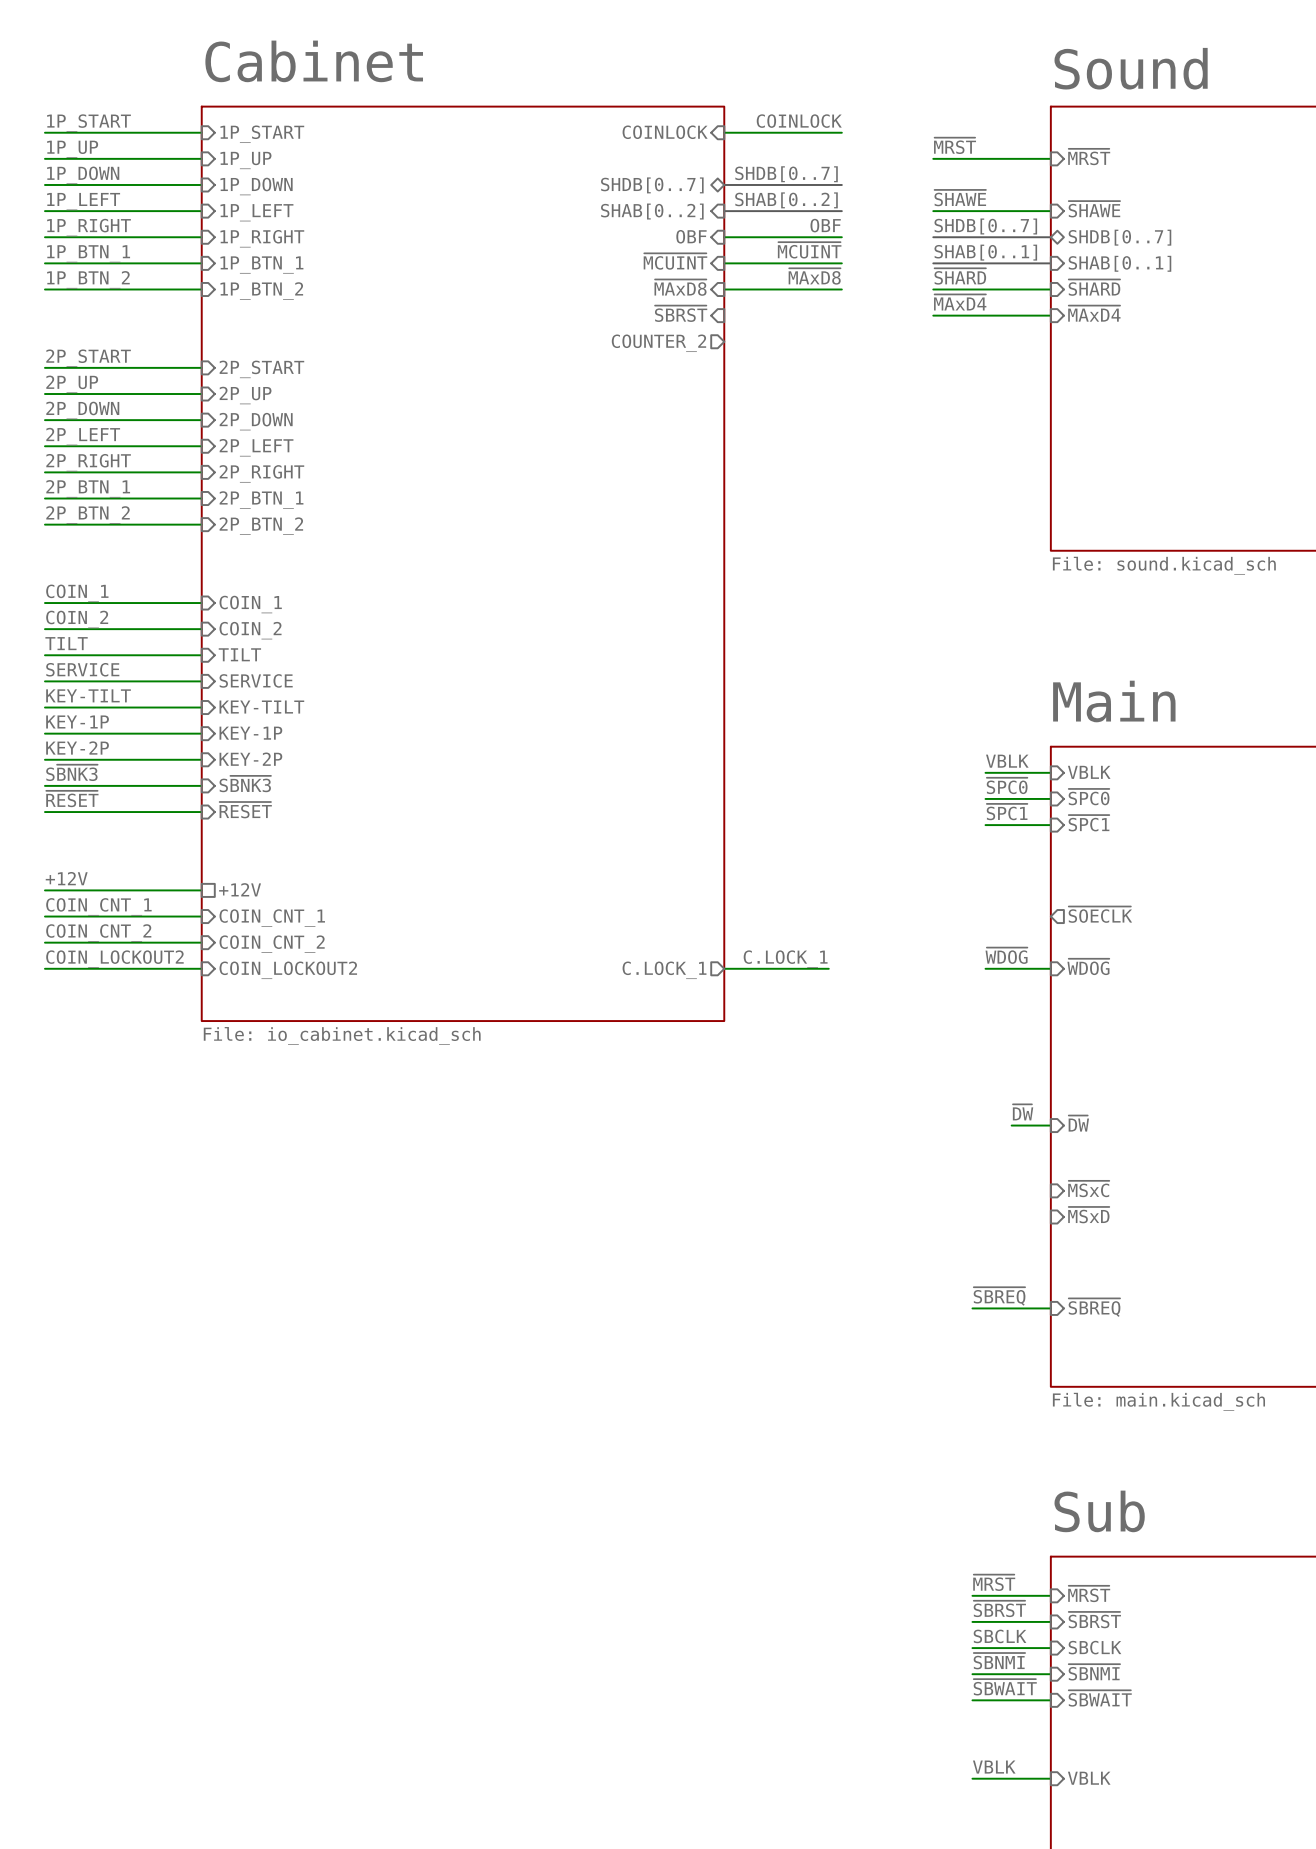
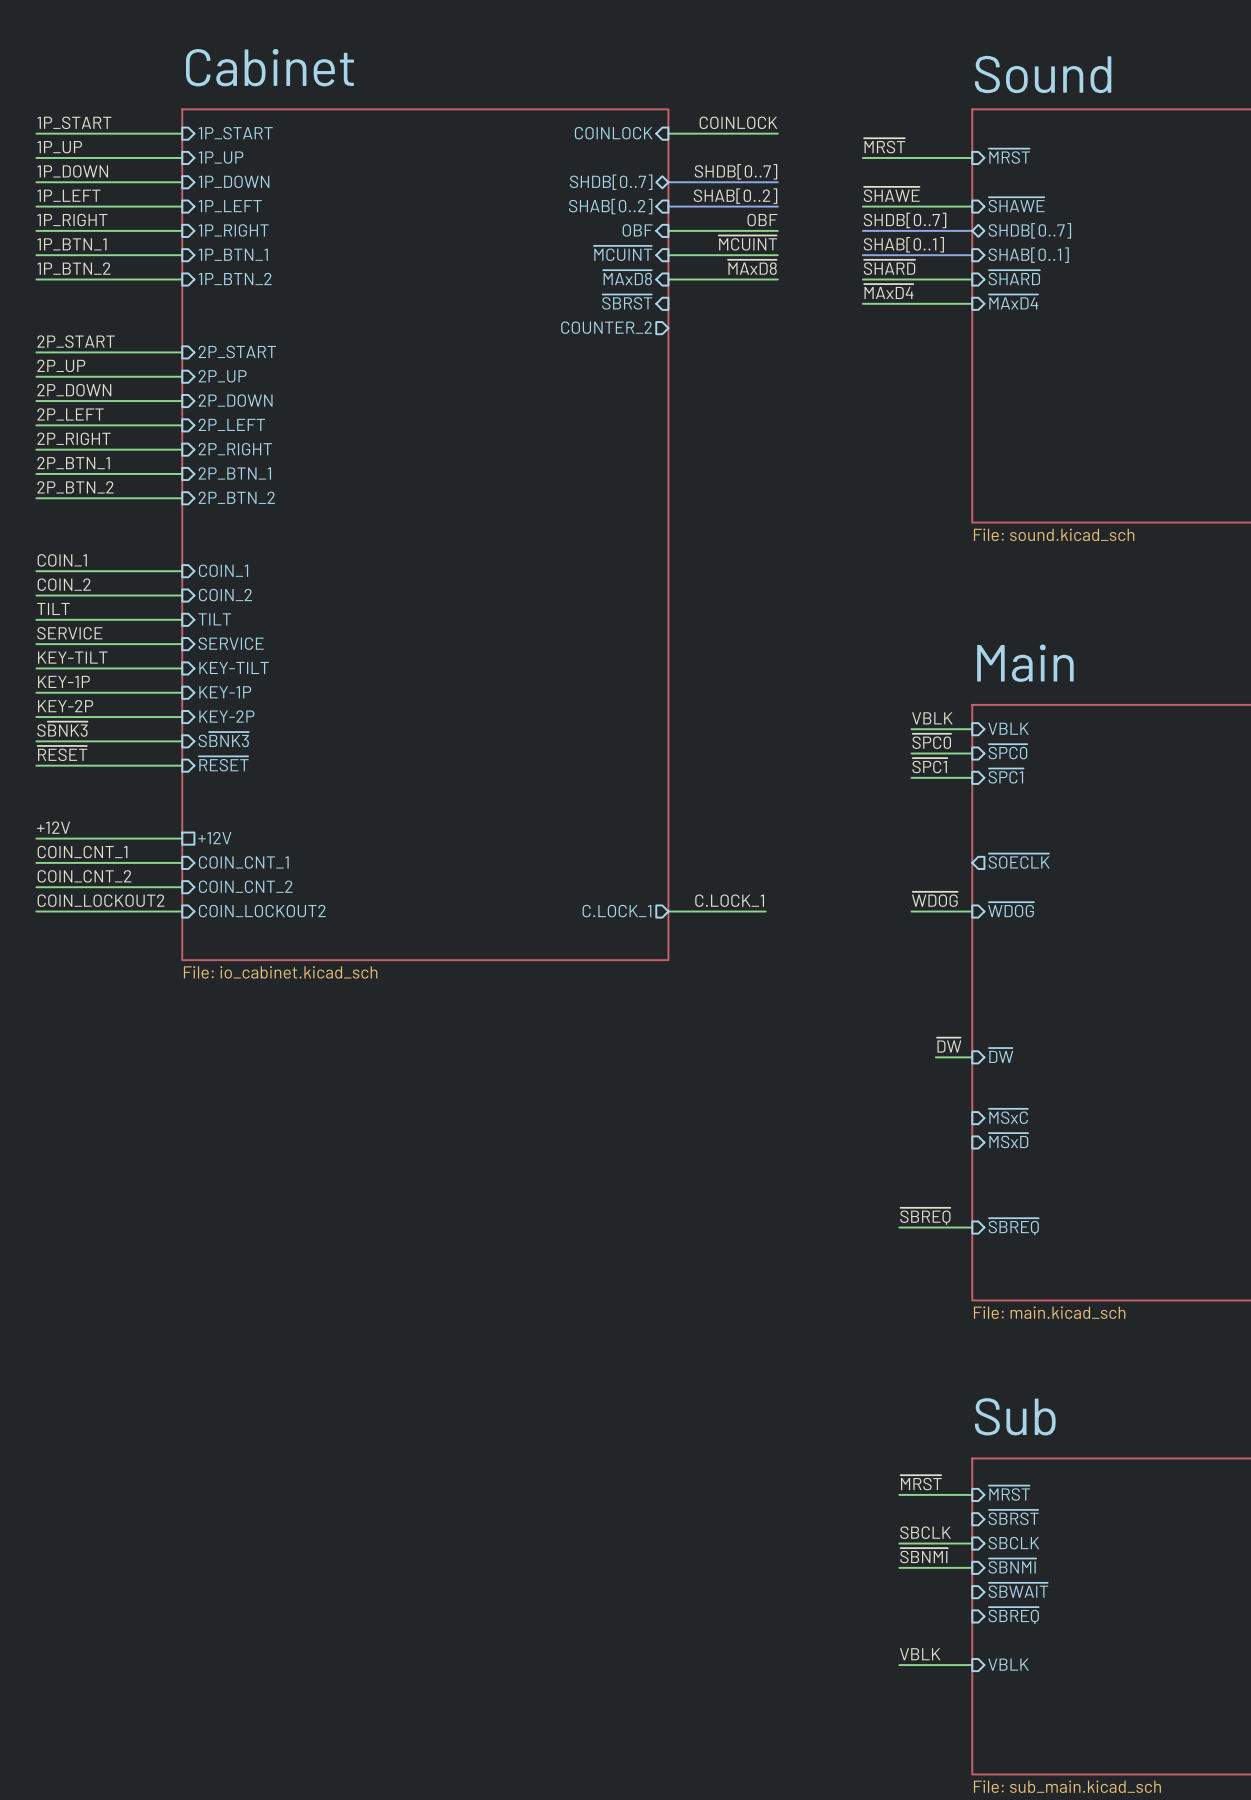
label: ~{SBRST} (999, 1608) -> none
wire: (972, 1621) (1050, 1621) -> none
label: ~{SBWAIT} (1005, 1687) -> none
wire: (972, 1700) (1050, 1700) -> none
sheet pin: none -> ~{SBREQ} (1013, 1615)

